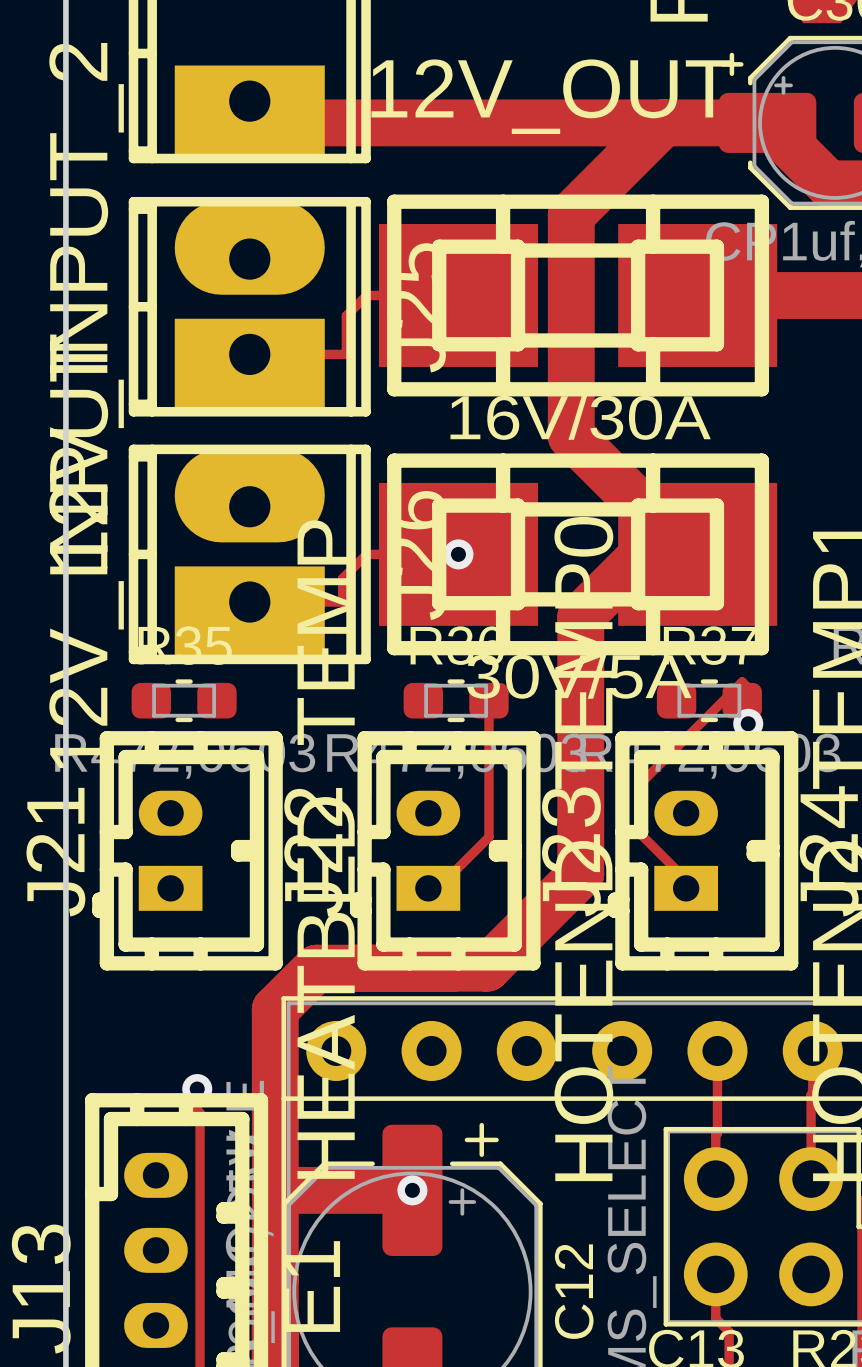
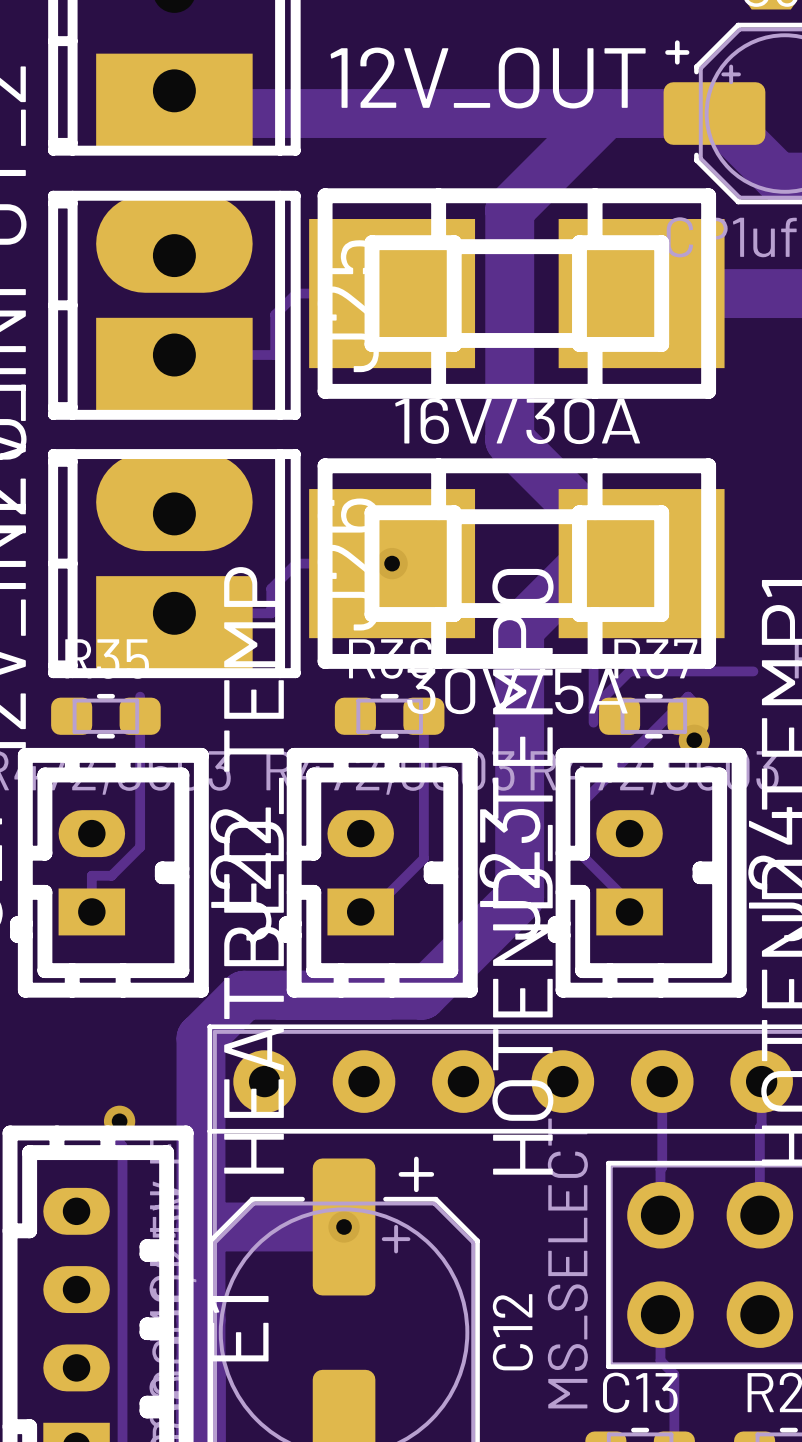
track: none -> (593, 668) (593, 722)
track: none -> (753, 671) (629, 671) (593, 707)
track: none -> (140, 696) (140, 847) (111, 875) (91, 875) (91, 911)

